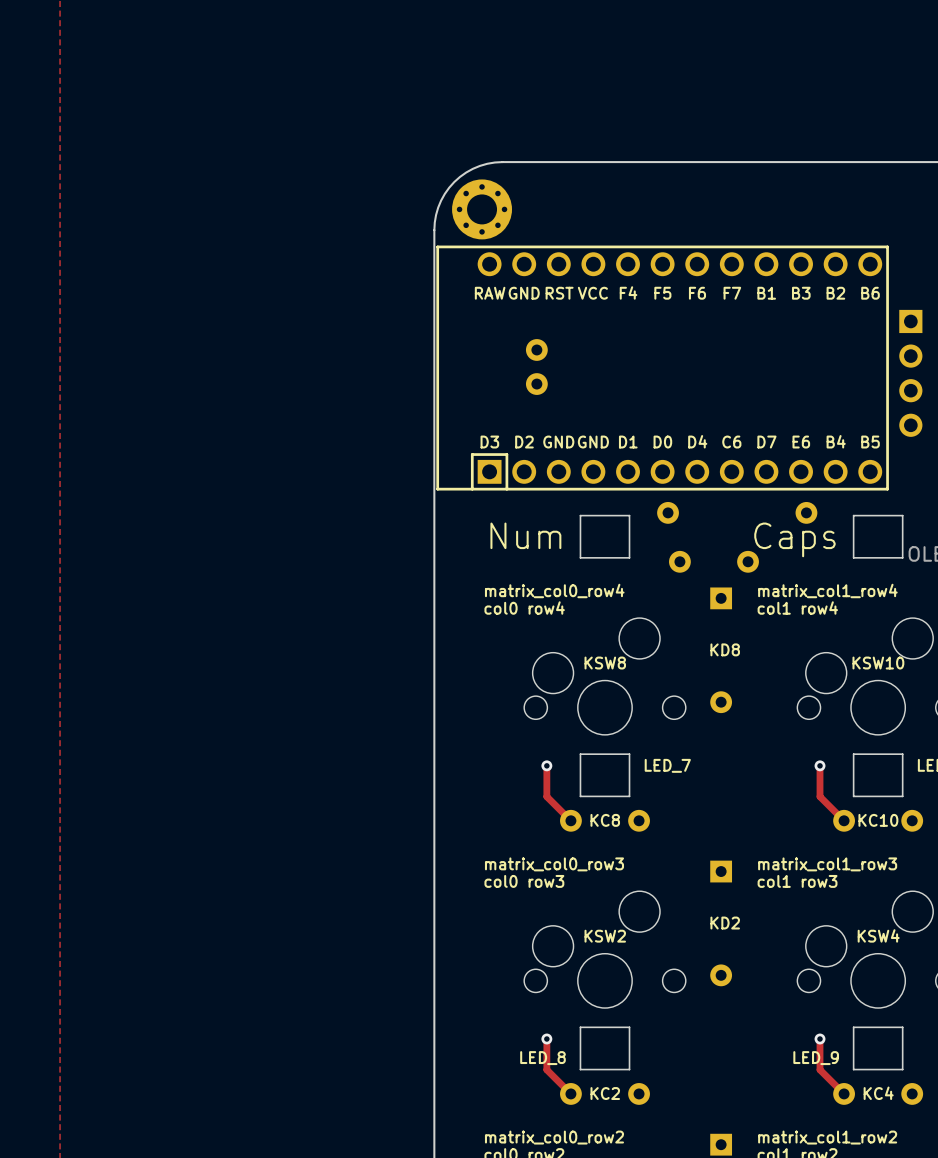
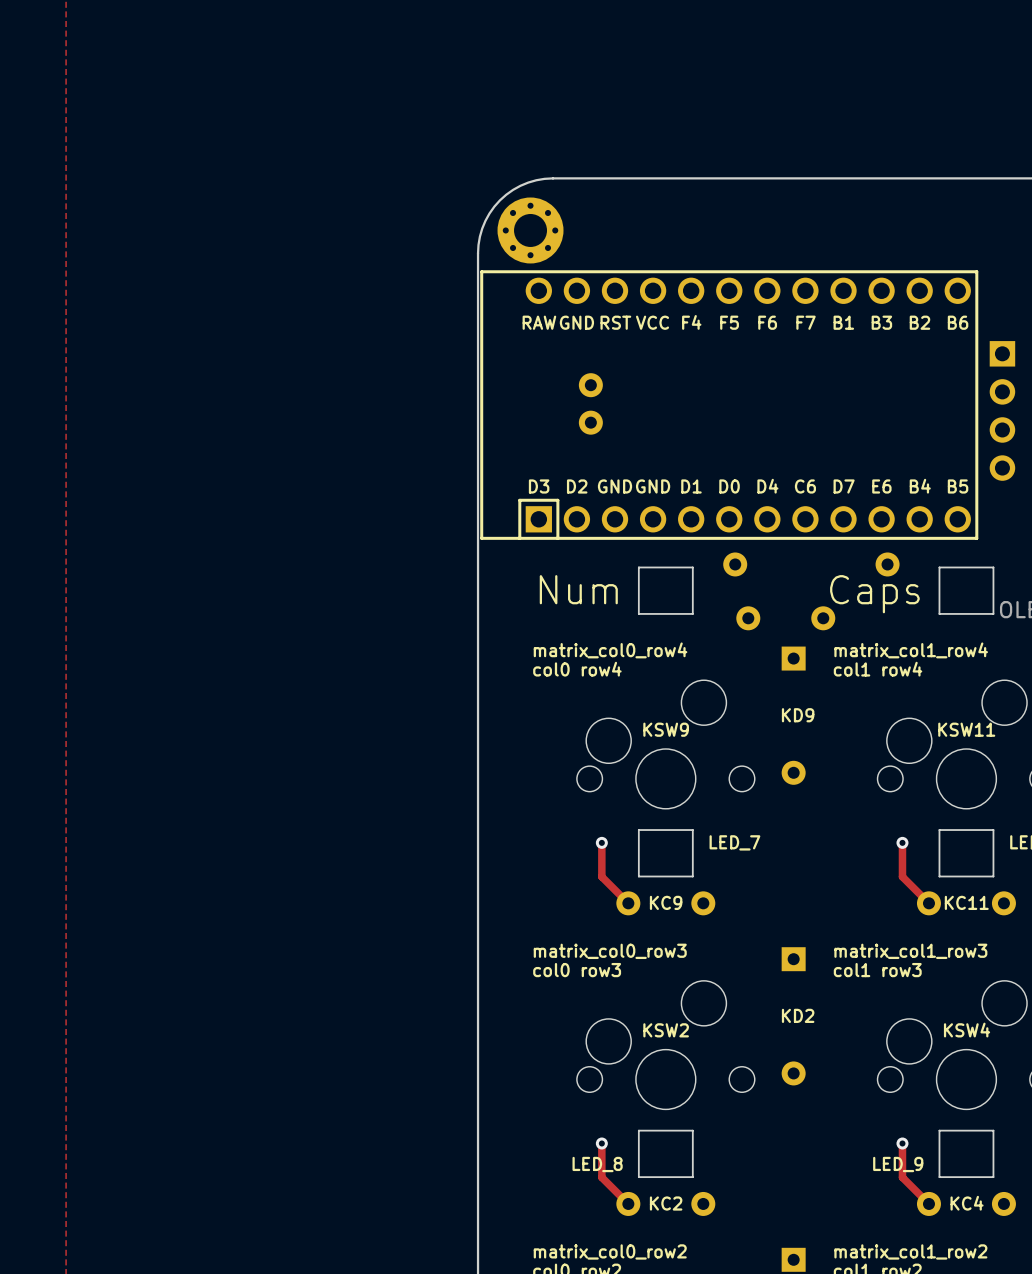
text: KD8 (725, 649) -> KD9 (798, 715)
KSW8 name: KSW8 (605, 663) -> KSW9 (666, 729)
KSW10 name: KSW10 (878, 663) -> KSW11 (966, 729)
text: KC8 (605, 820) -> KC9 (666, 902)
text: KC10 (878, 820) -> KC11 (966, 902)

